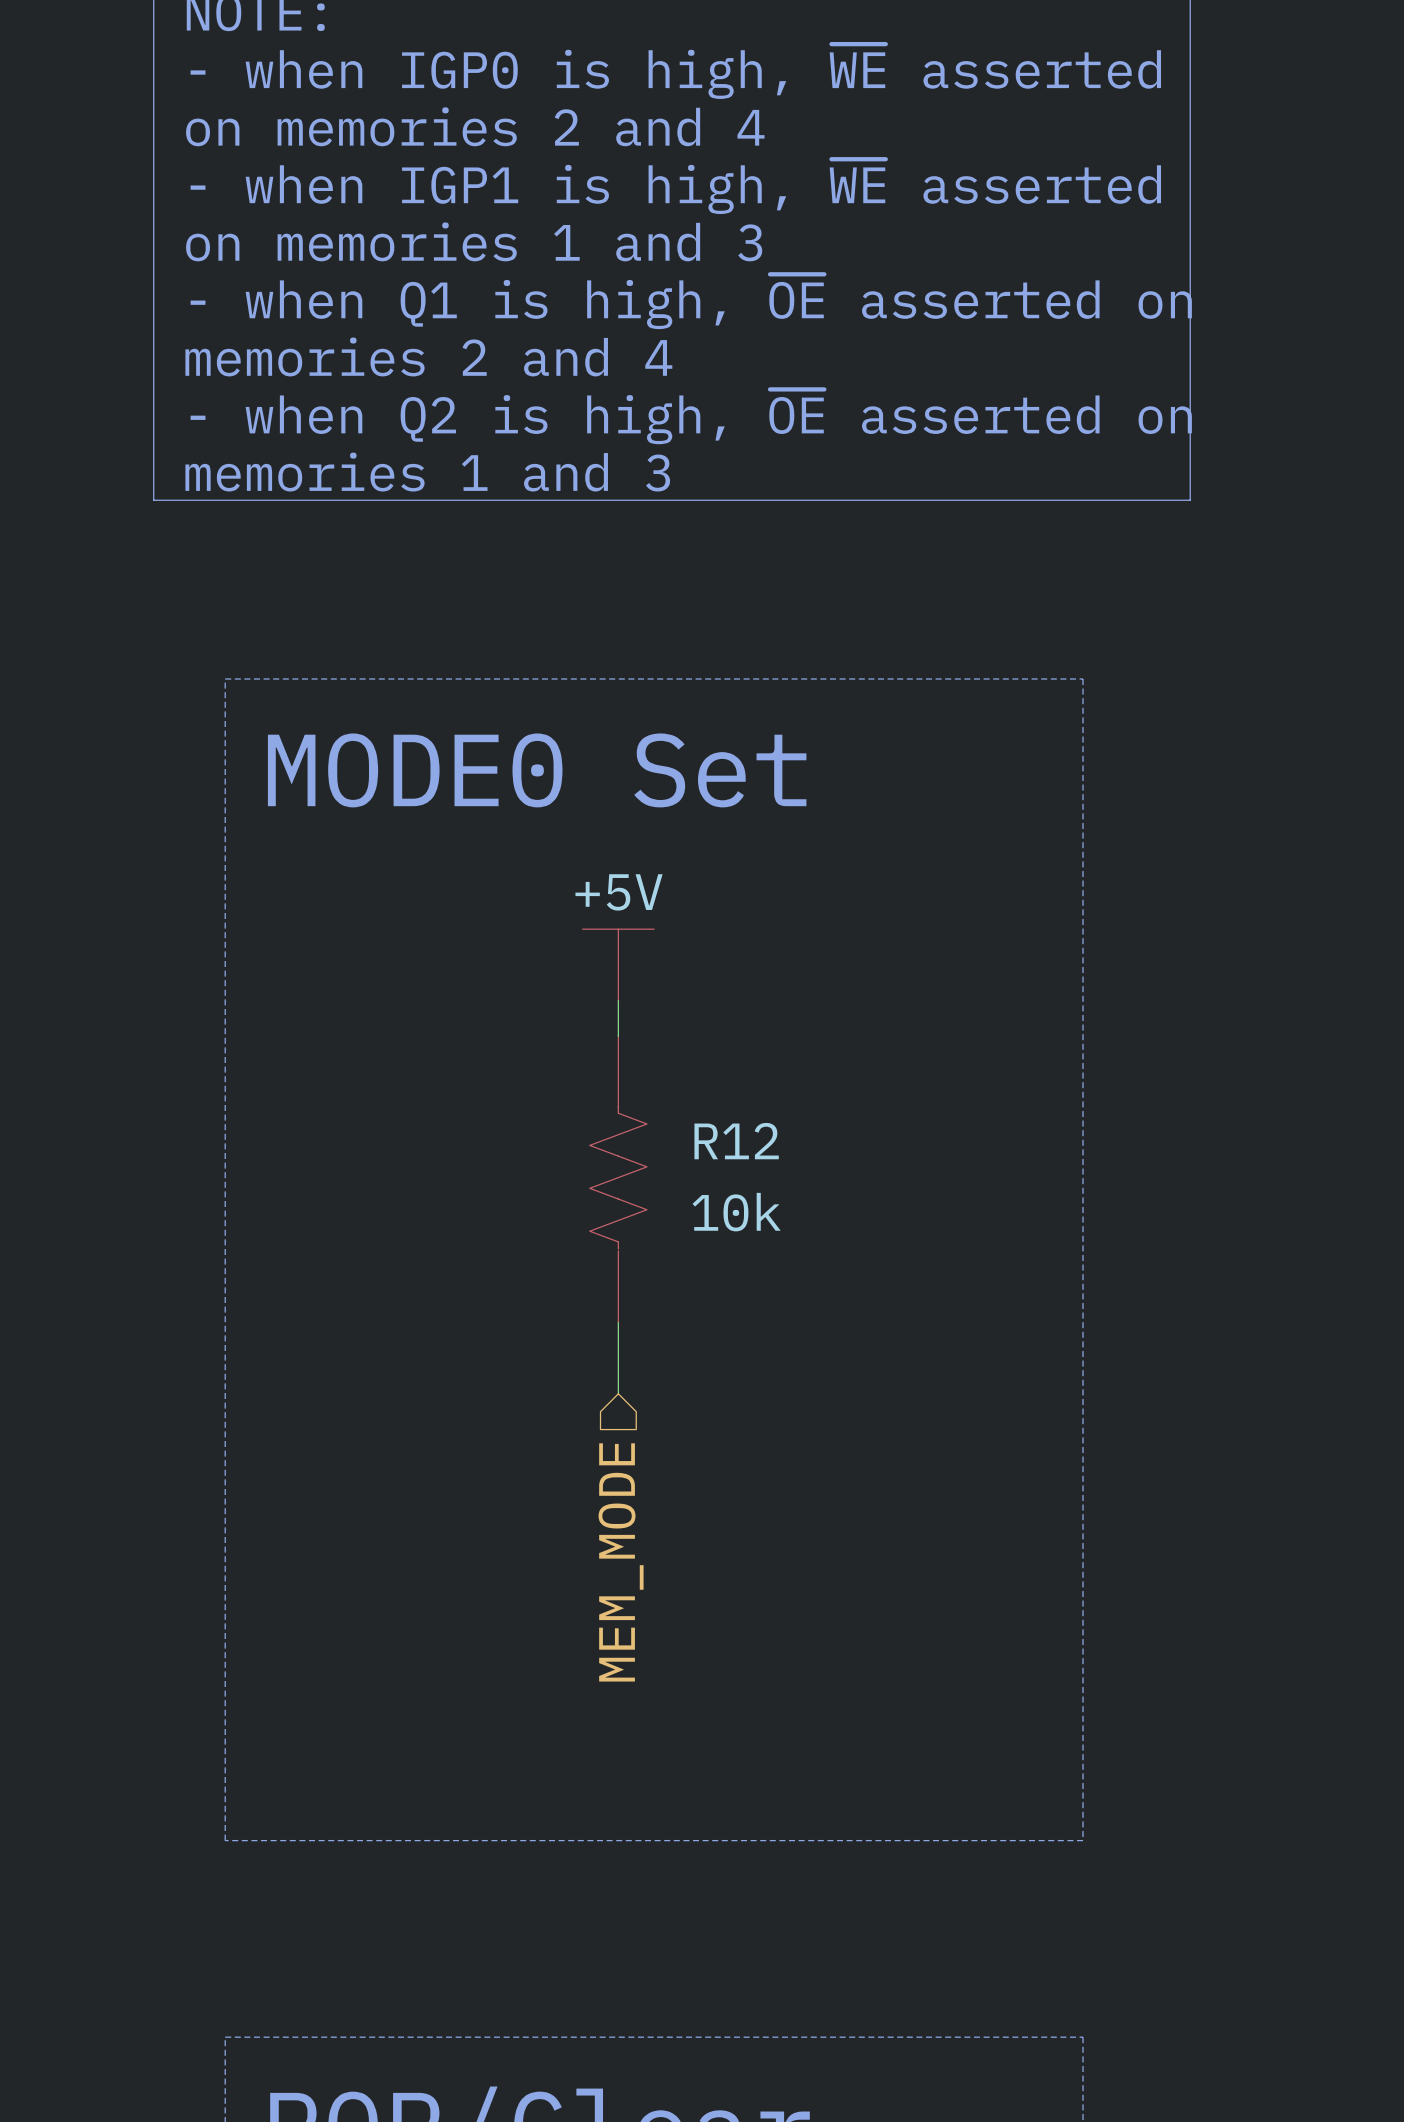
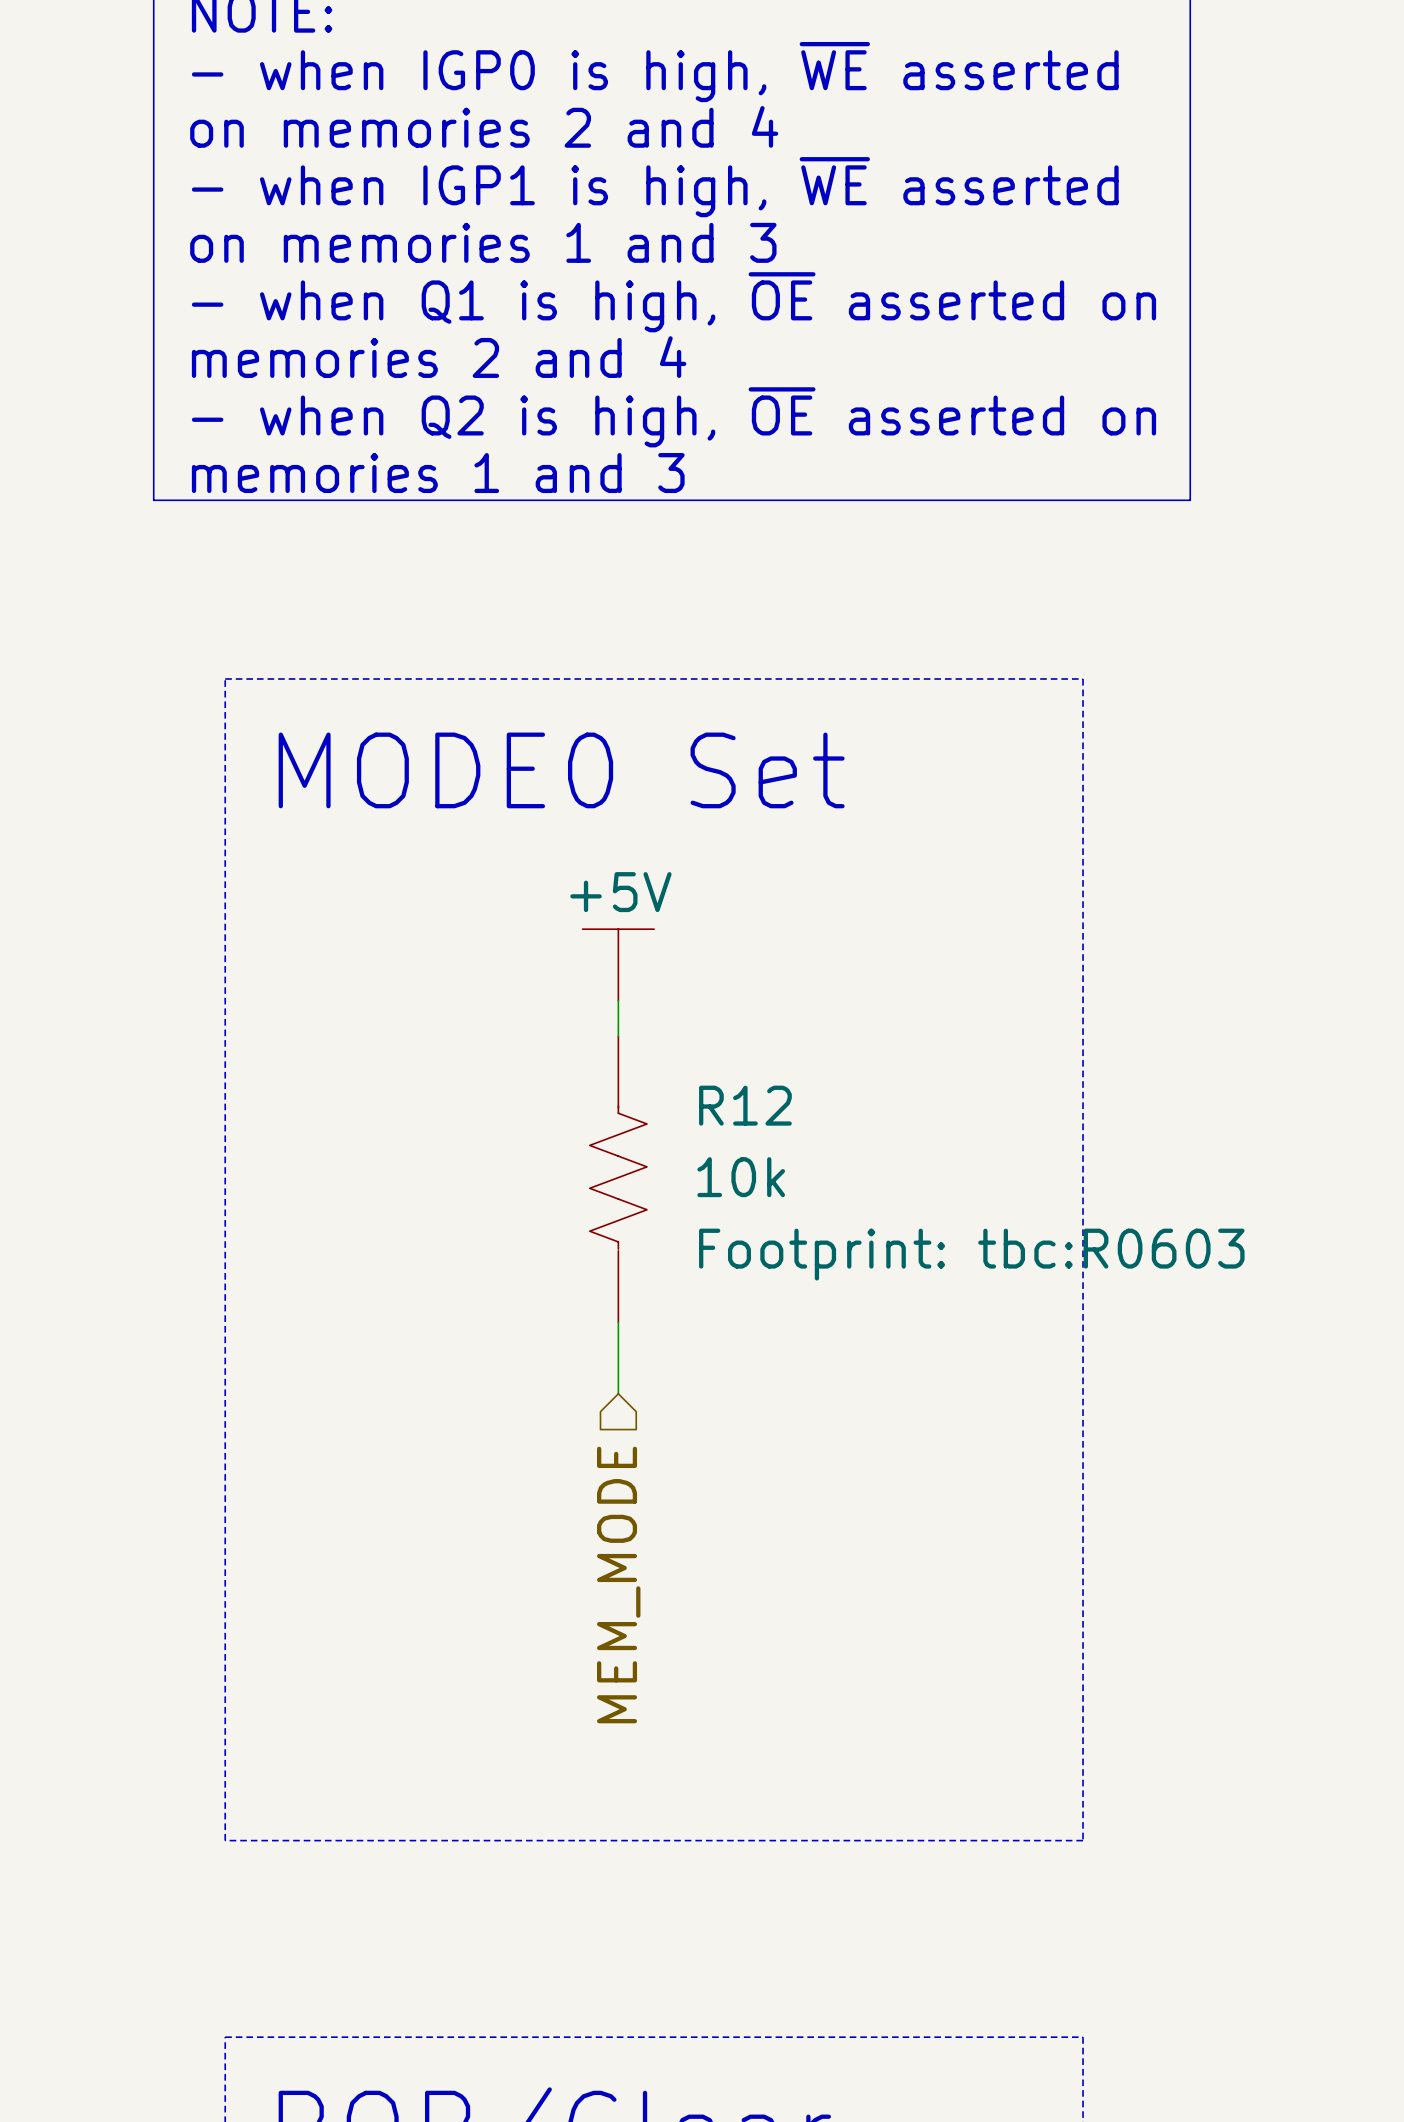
R12 name position: R12 (736, 1141) -> R12 (745, 1105)
R12 value position: 10k (736, 1212) -> 10k (741, 1177)
R12 text: none -> Footprint: tbc:R0603 (971, 1254)

